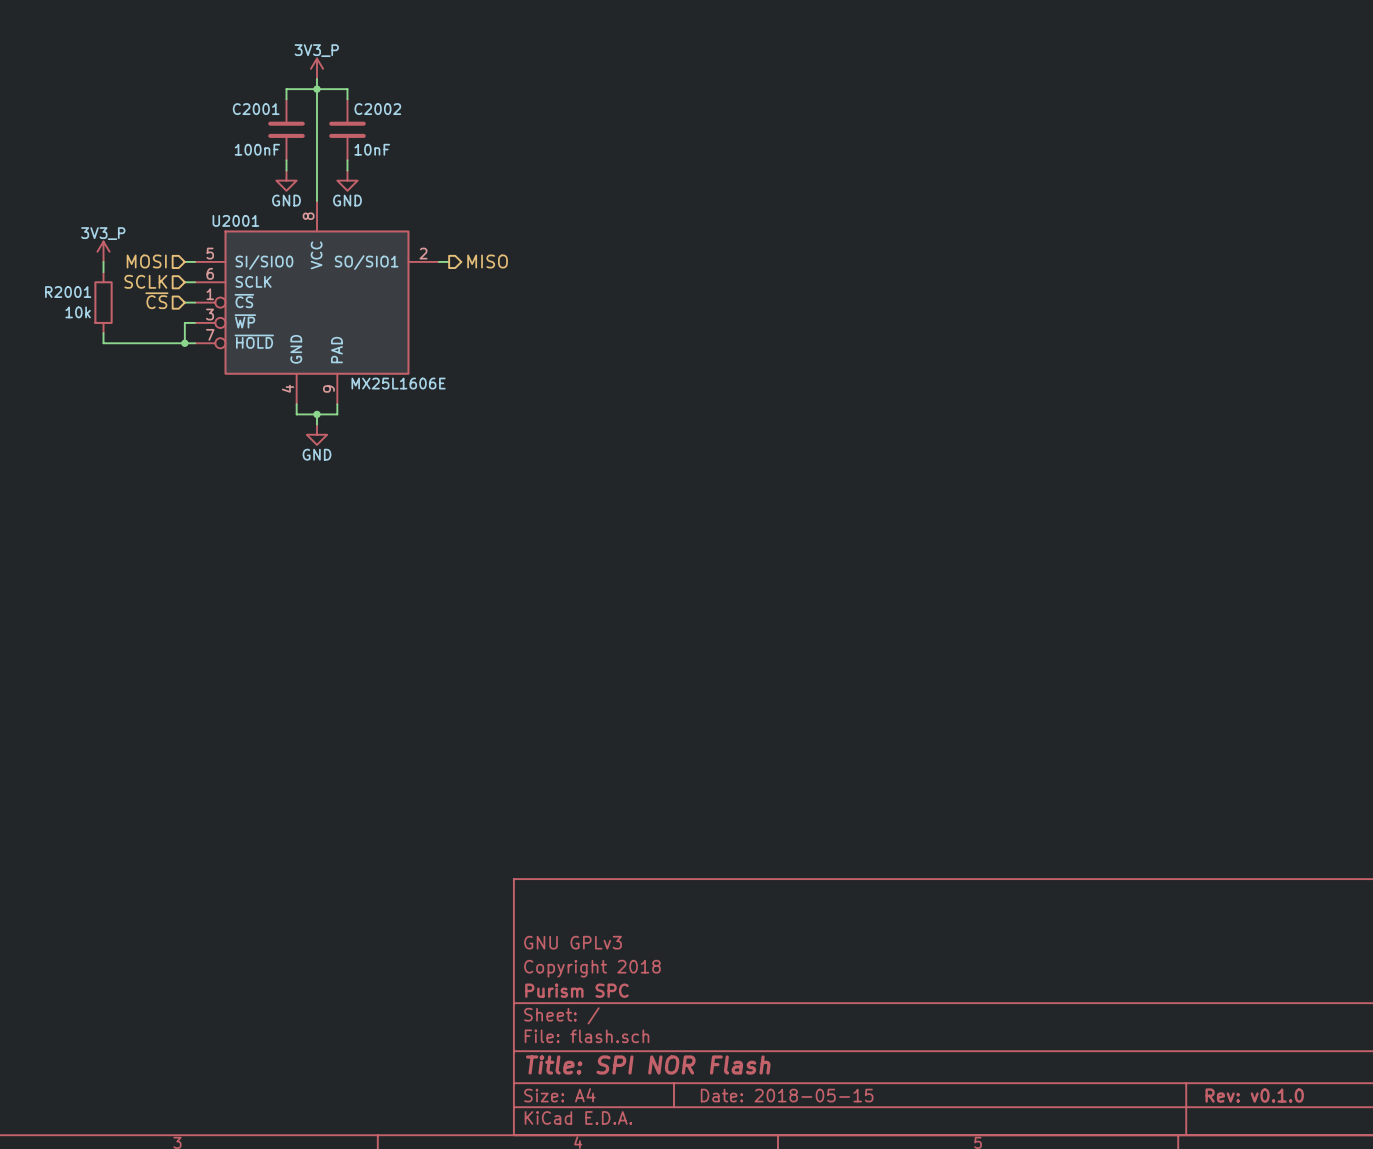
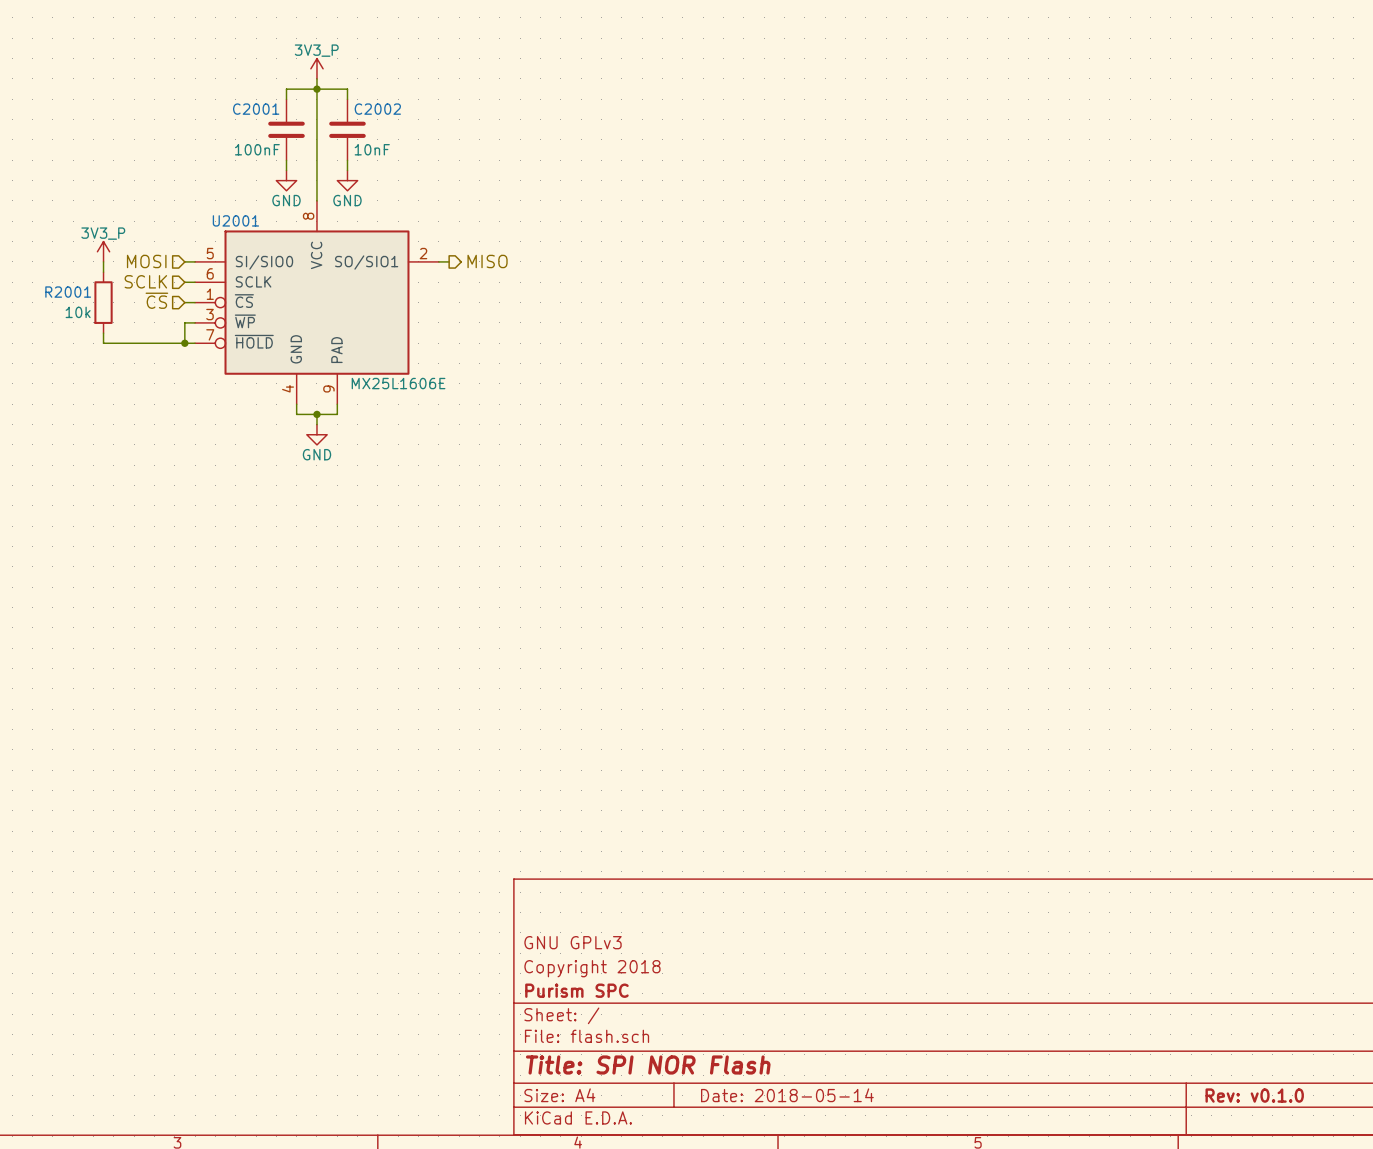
title block: Date: 2018-05-15 (787, 1095) -> Date: 2018-05-14 (787, 1095)

